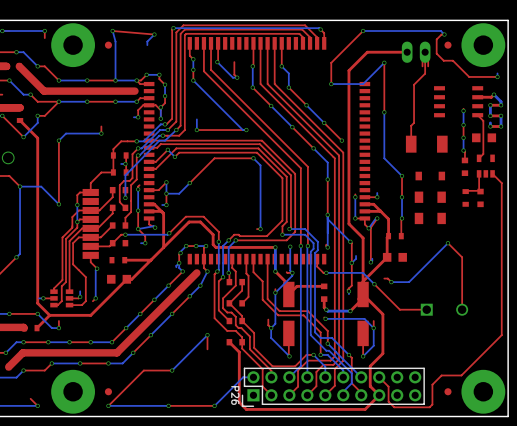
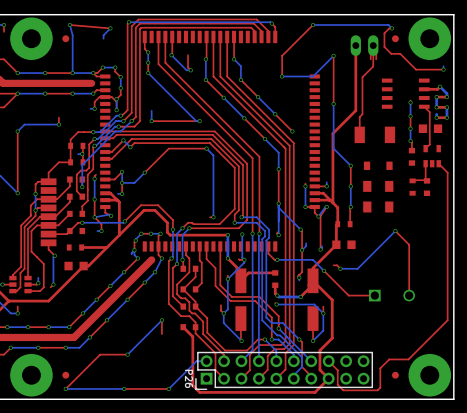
top track: (407, 52) (367, 52) (348, 70) (348, 223) (363, 238) (363, 281) -> (355, 45) (355, 110) (332, 133) (332, 202)

